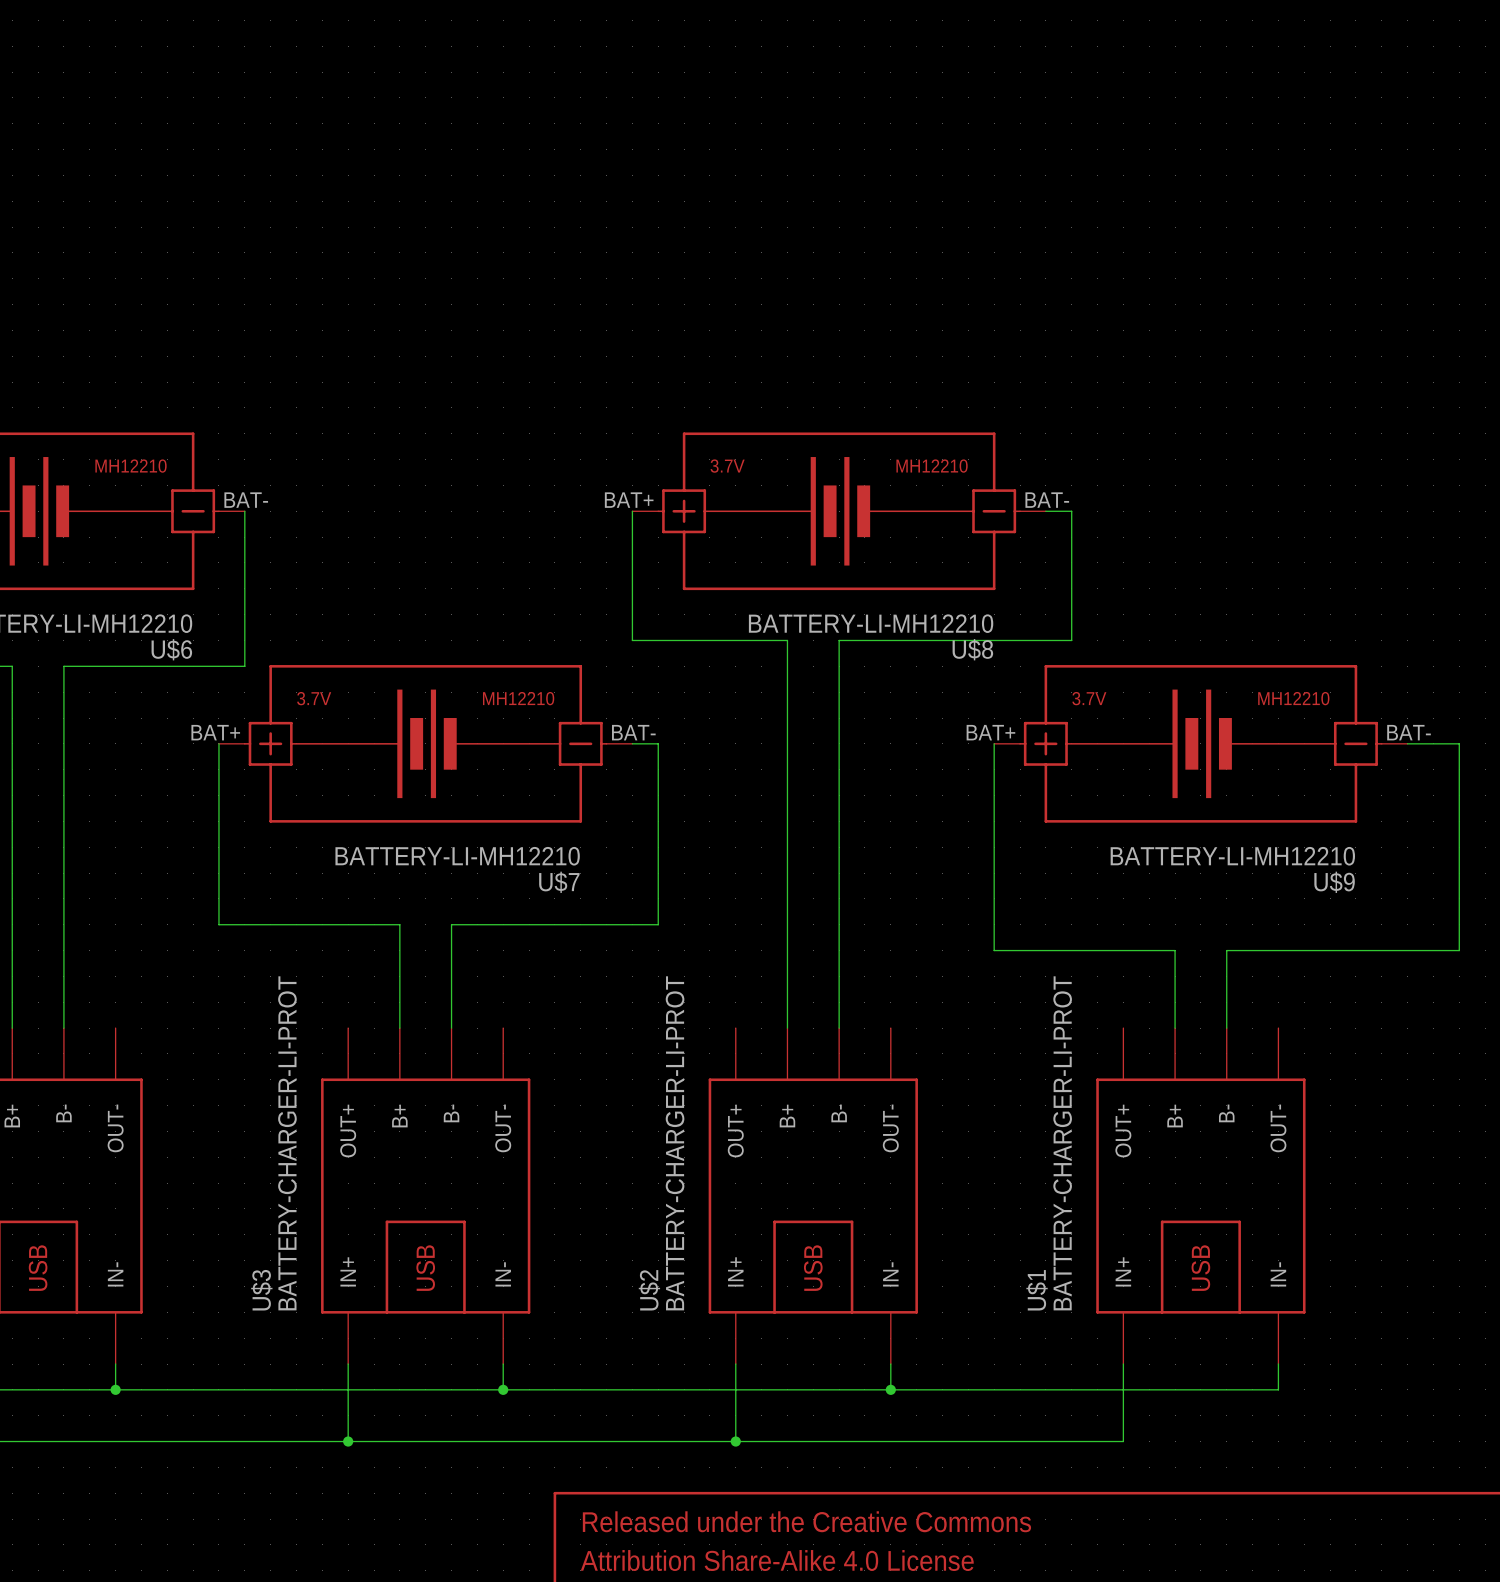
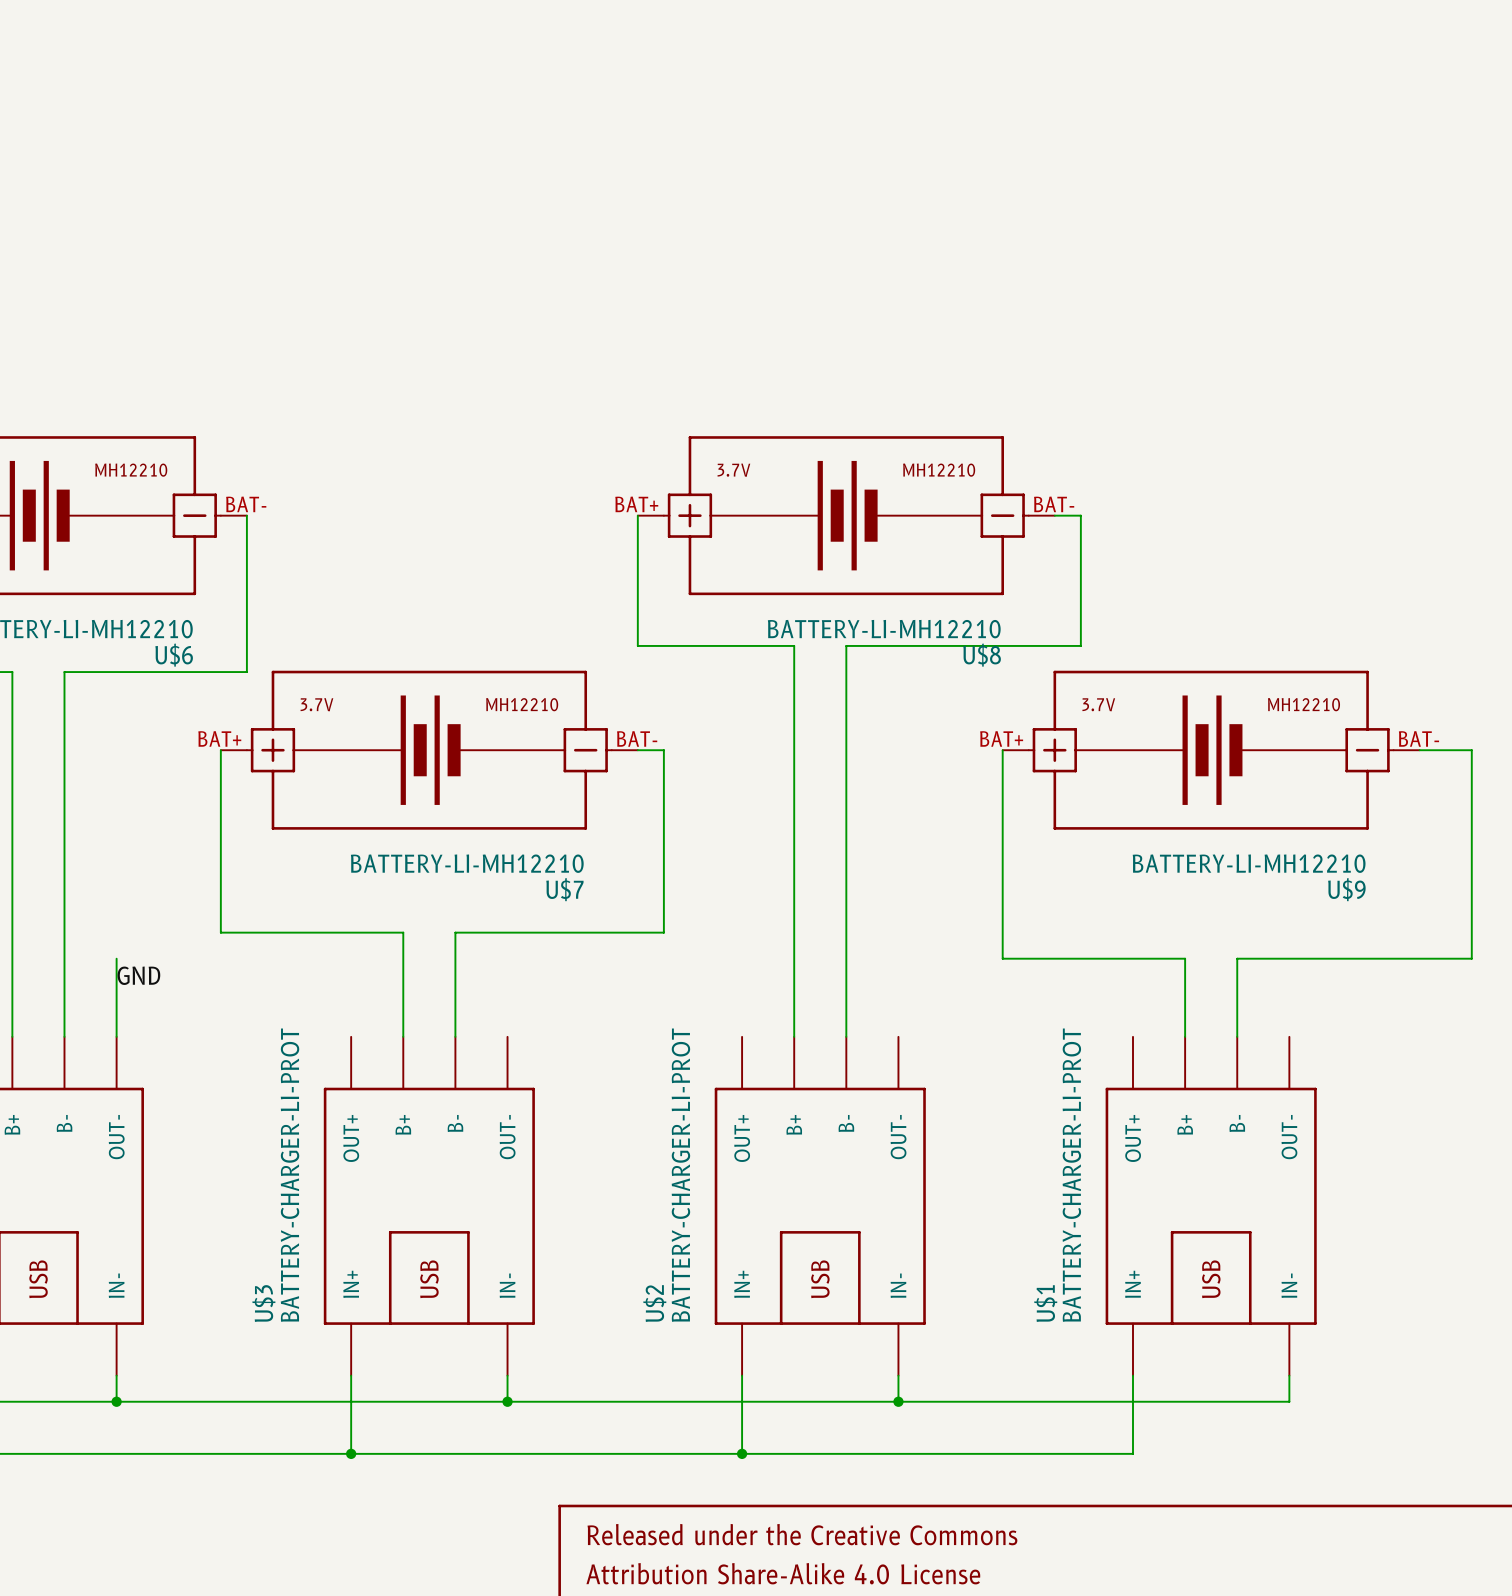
wire: none -> (116, 958) (116, 1036)
label: none -> GND (138, 975)

